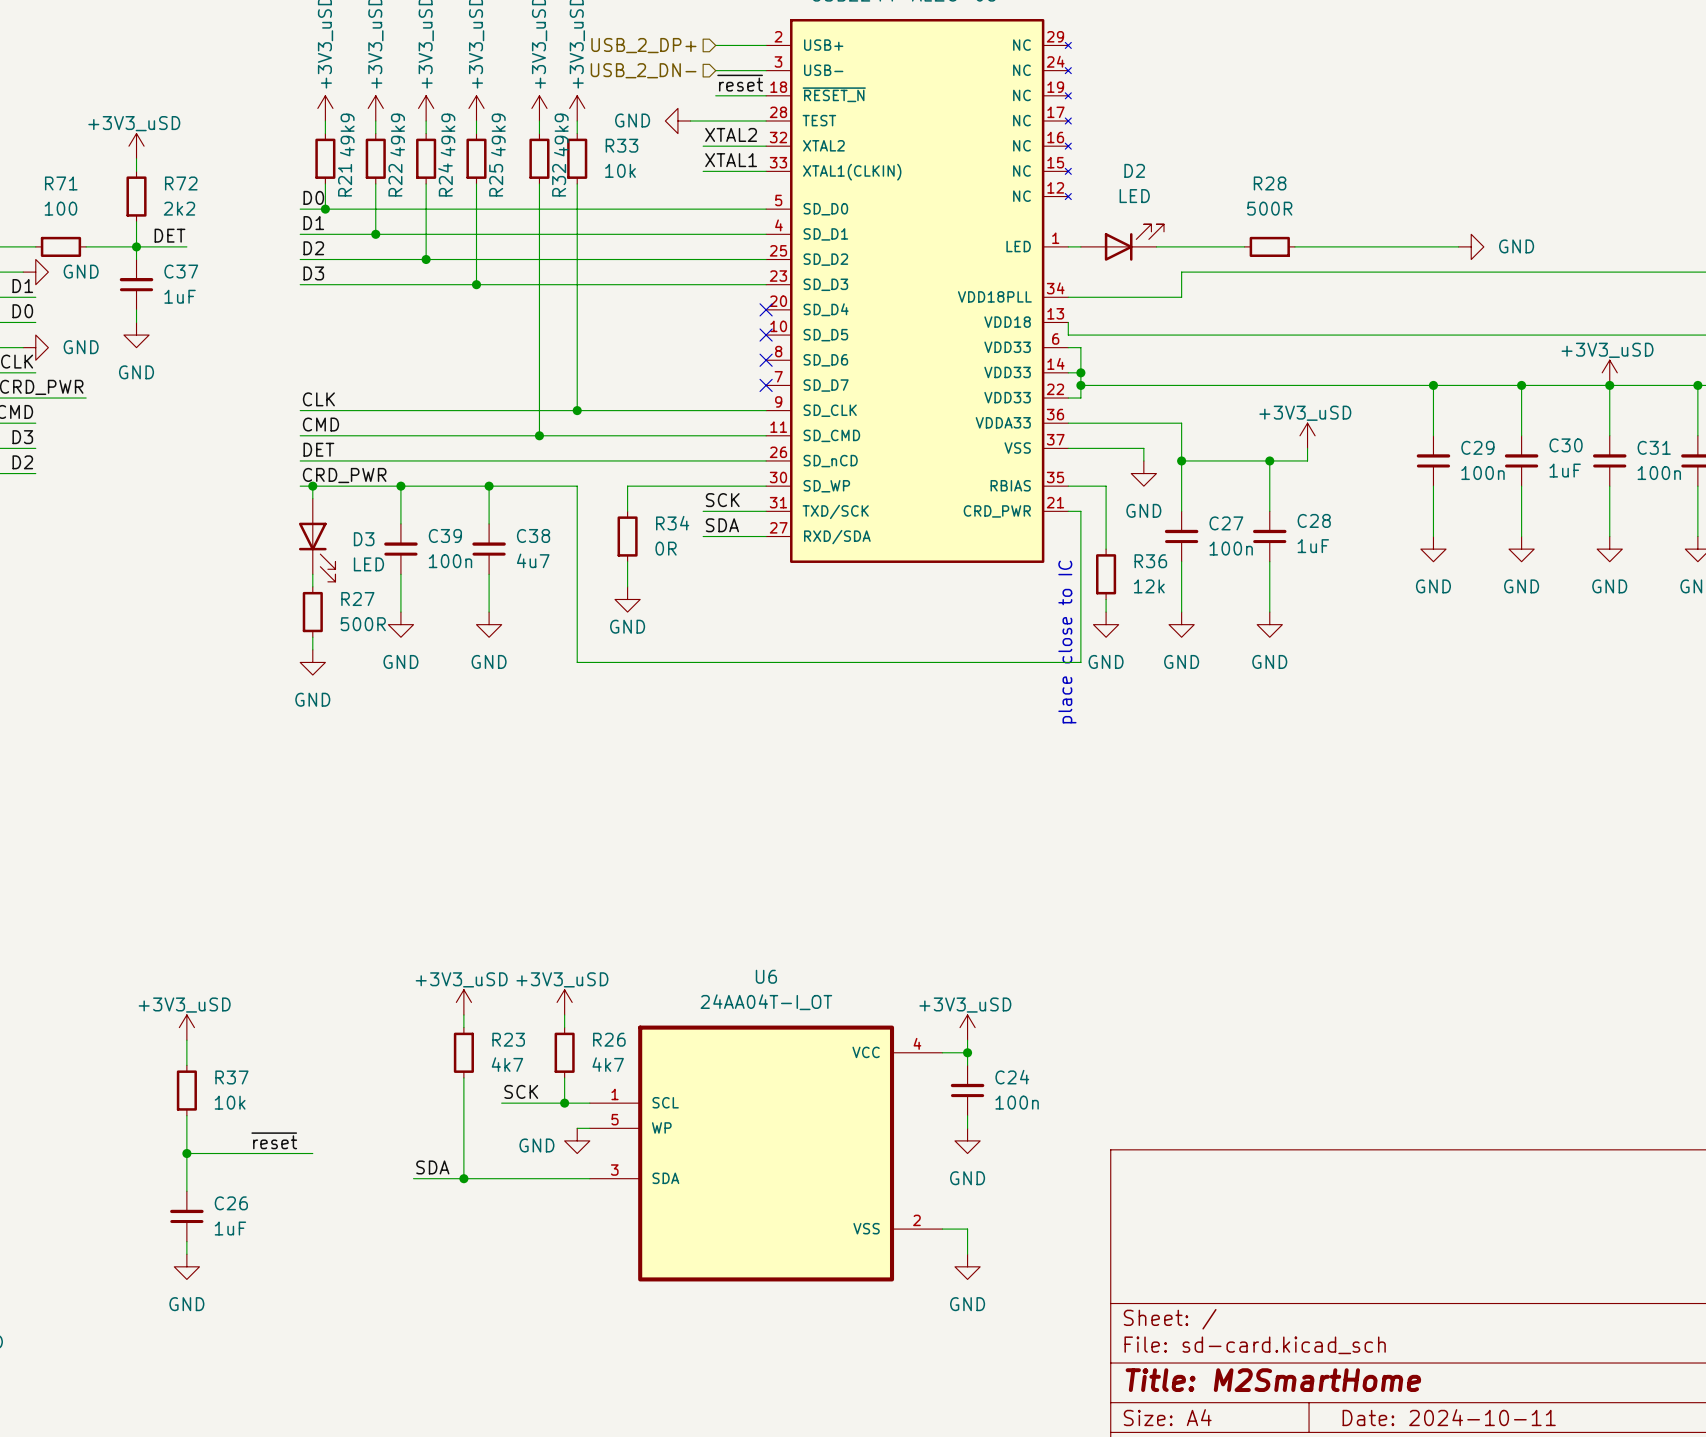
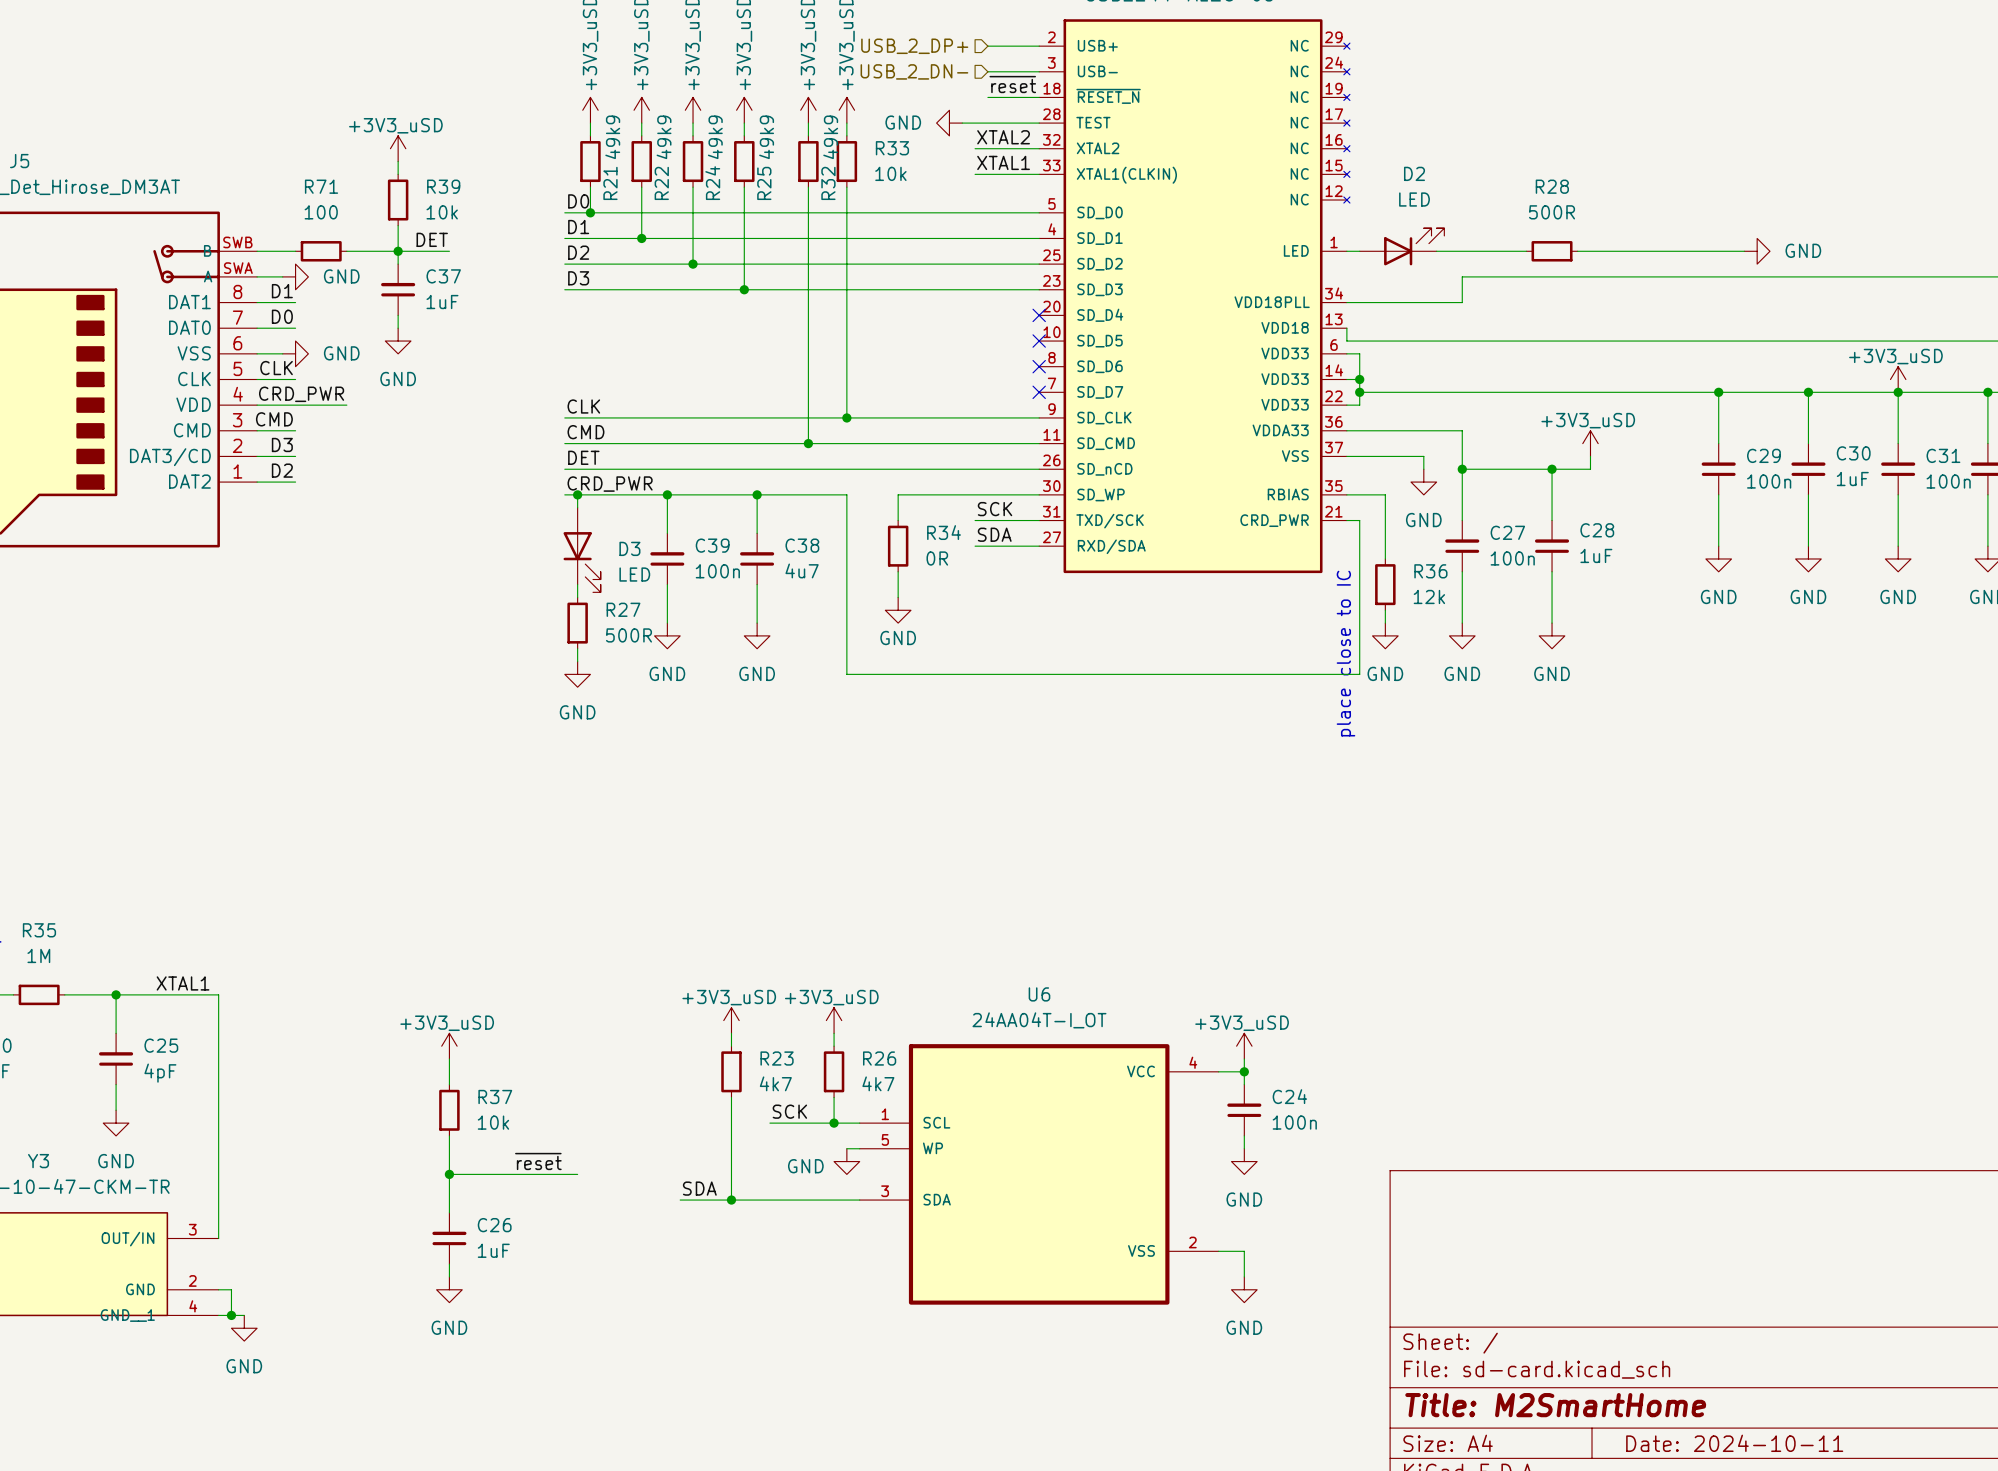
R72 name: R72 (181, 183) -> R39 (443, 186)
R72 text: 2k2 (179, 208) -> 10k (442, 212)

